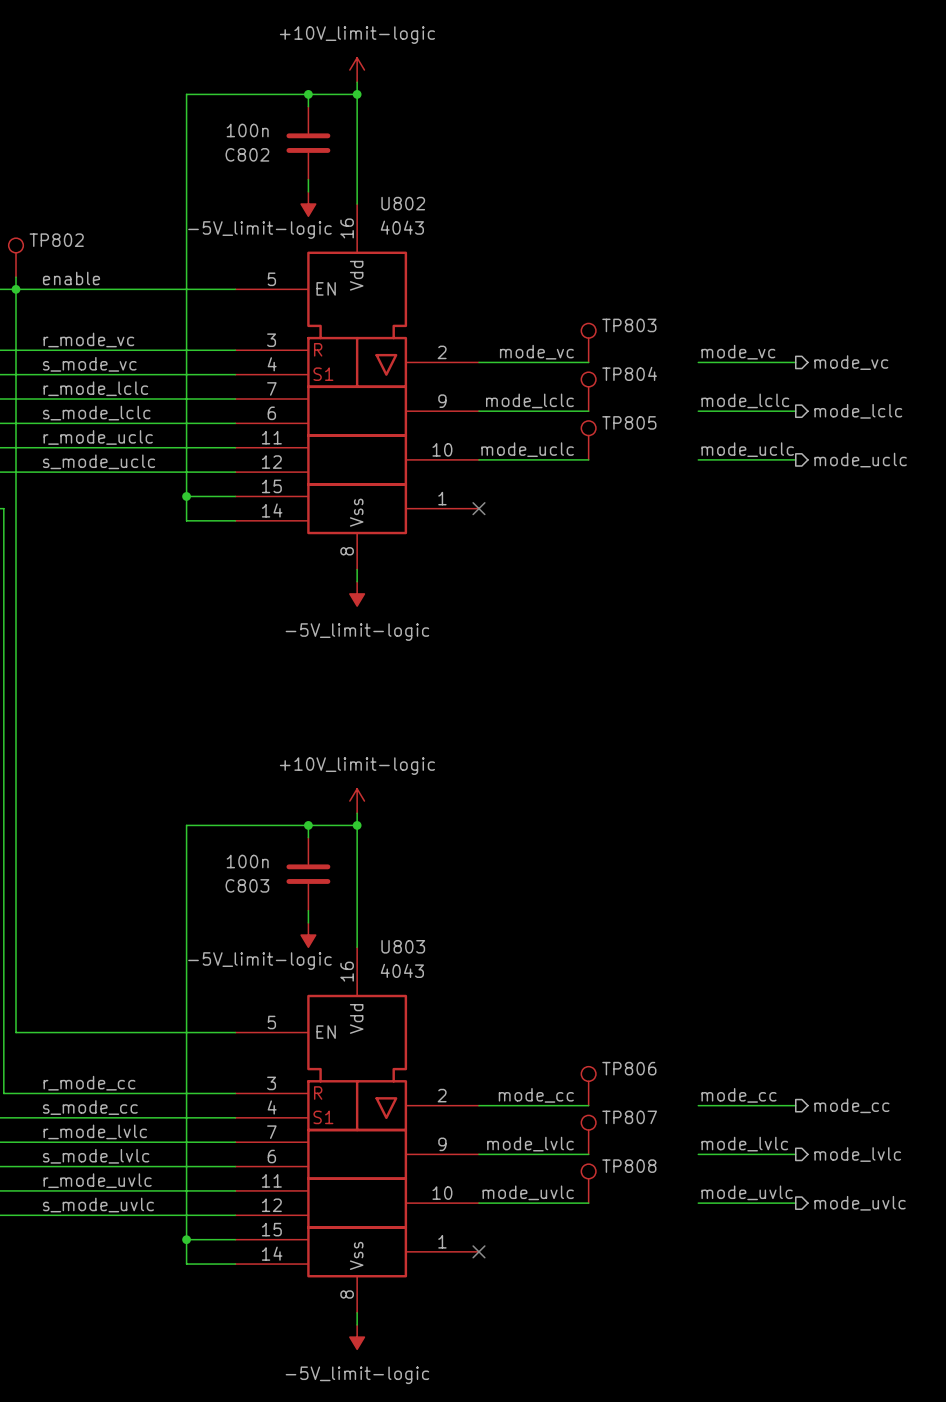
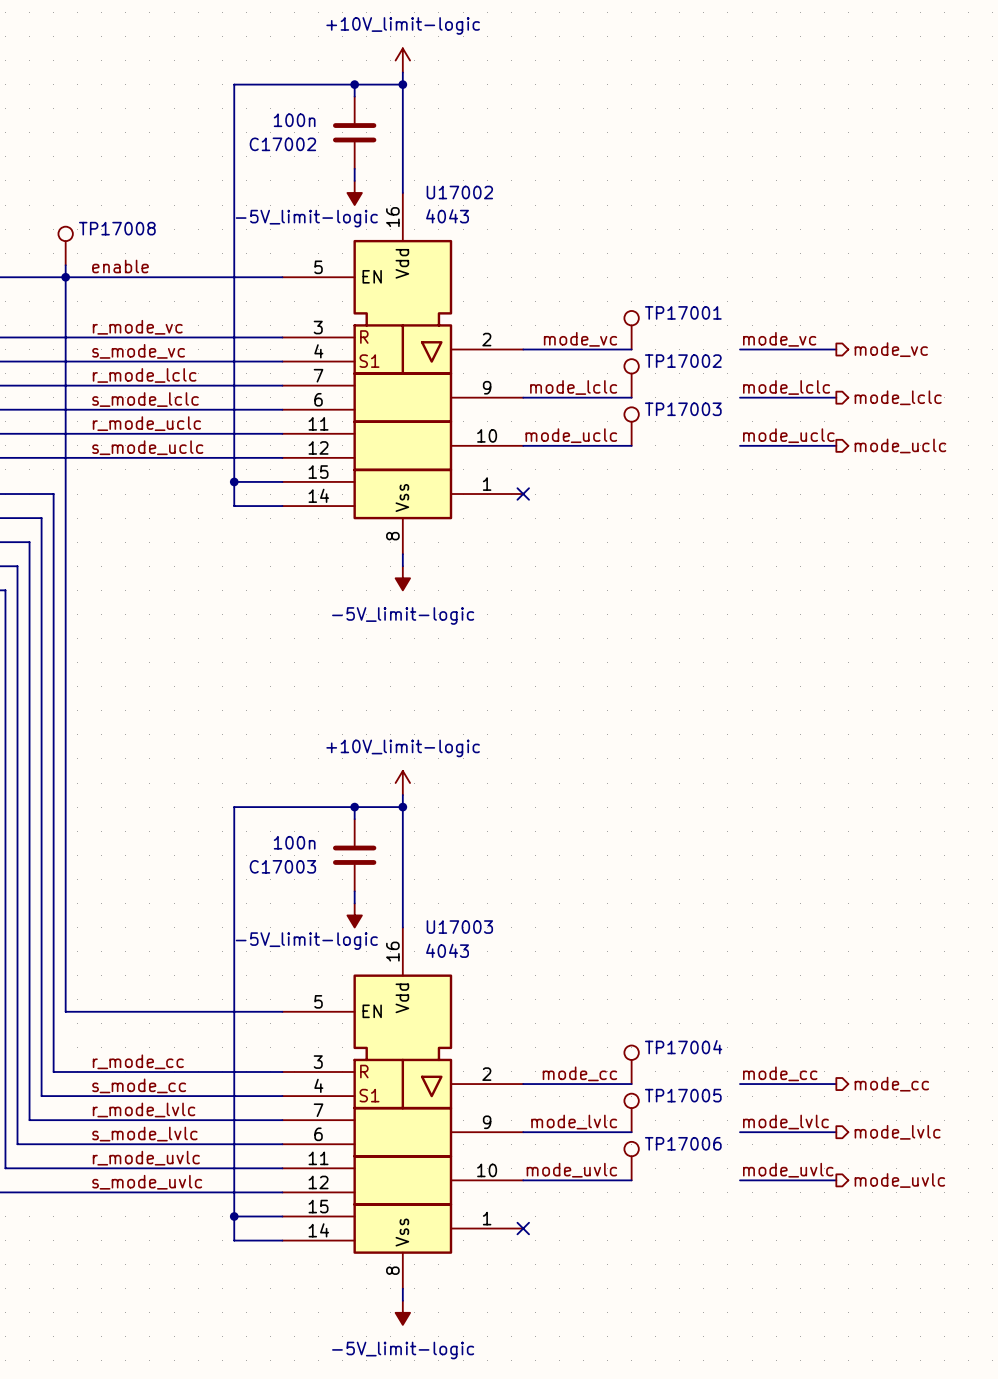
C802 name: C802 (247, 154) -> C17002 (282, 144)
U802 name: U802 (403, 203) -> U17002 (459, 192)
TP802 name: TP802 (56, 240) -> TP17008 (117, 228)
TP803 name: TP803 (629, 325) -> TP17001 (683, 312)
TP804 name: TP804 (629, 373) -> TP17002 (683, 361)
TP805 name: TP805 (629, 422) -> TP17003 (683, 409)
C803 name: C803 (247, 885) -> C17003 (282, 866)
U803 name: U803 (403, 946) -> U17003 (459, 927)
TP806 name: TP806 (629, 1068) -> TP17004 (683, 1047)
TP807 name: TP807 (629, 1117) -> TP17005 (683, 1095)
TP808 name: TP808 (629, 1166) -> TP17006 (683, 1143)

